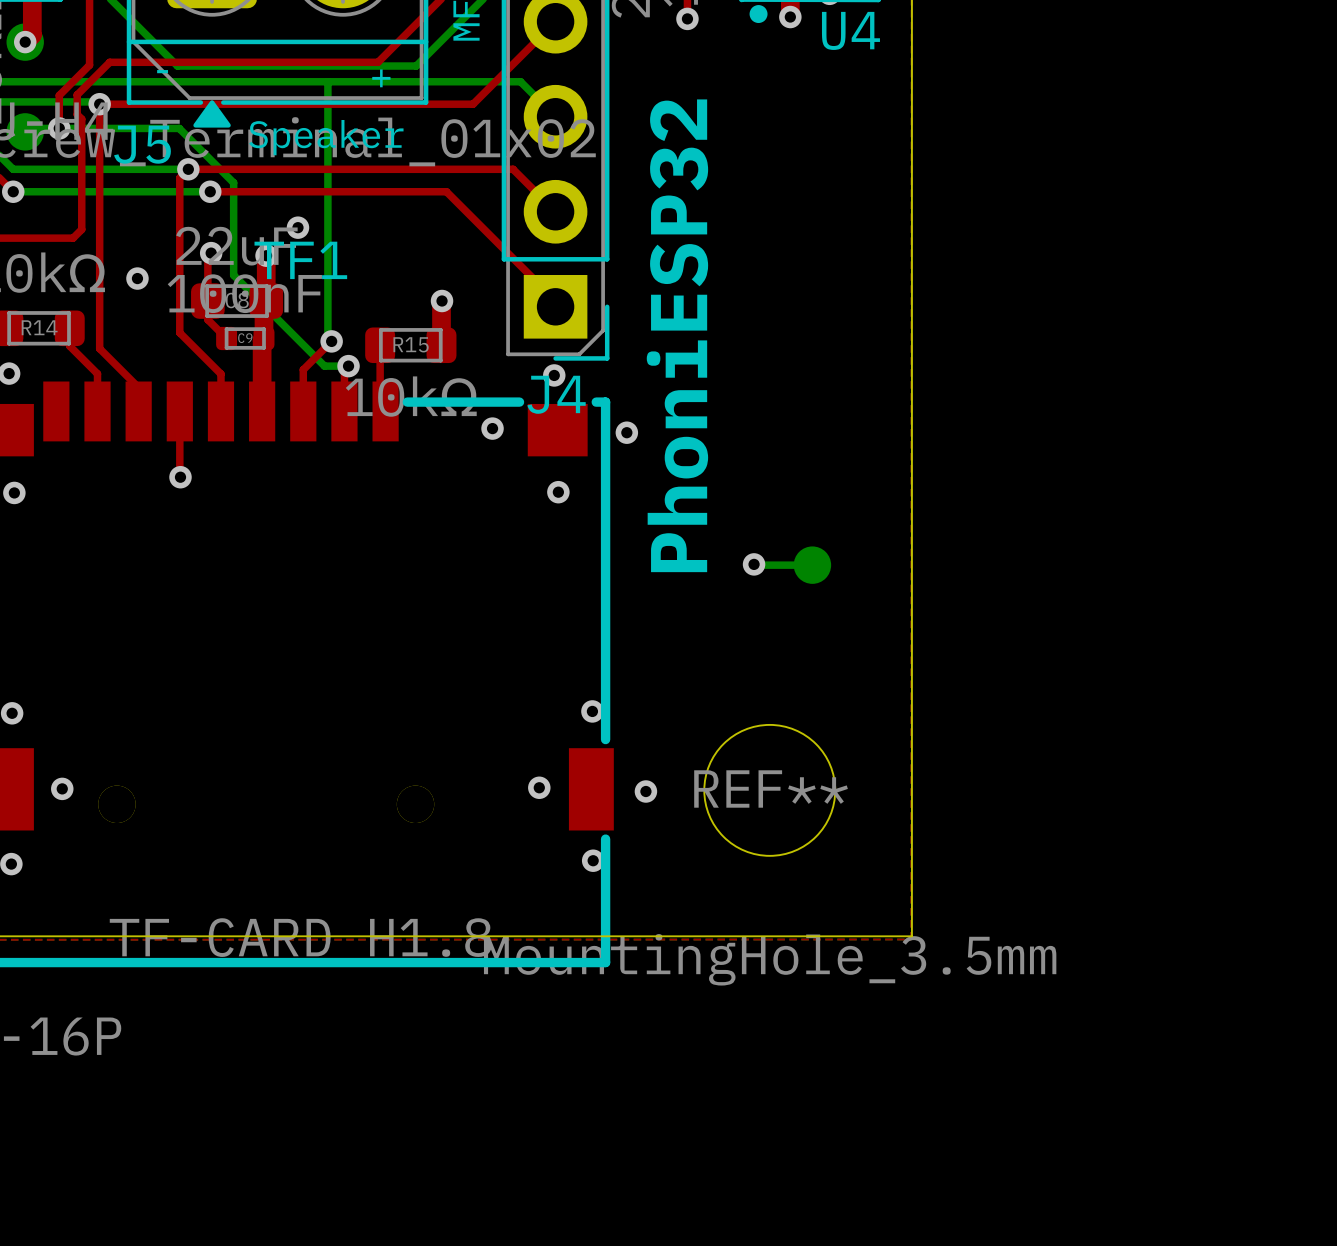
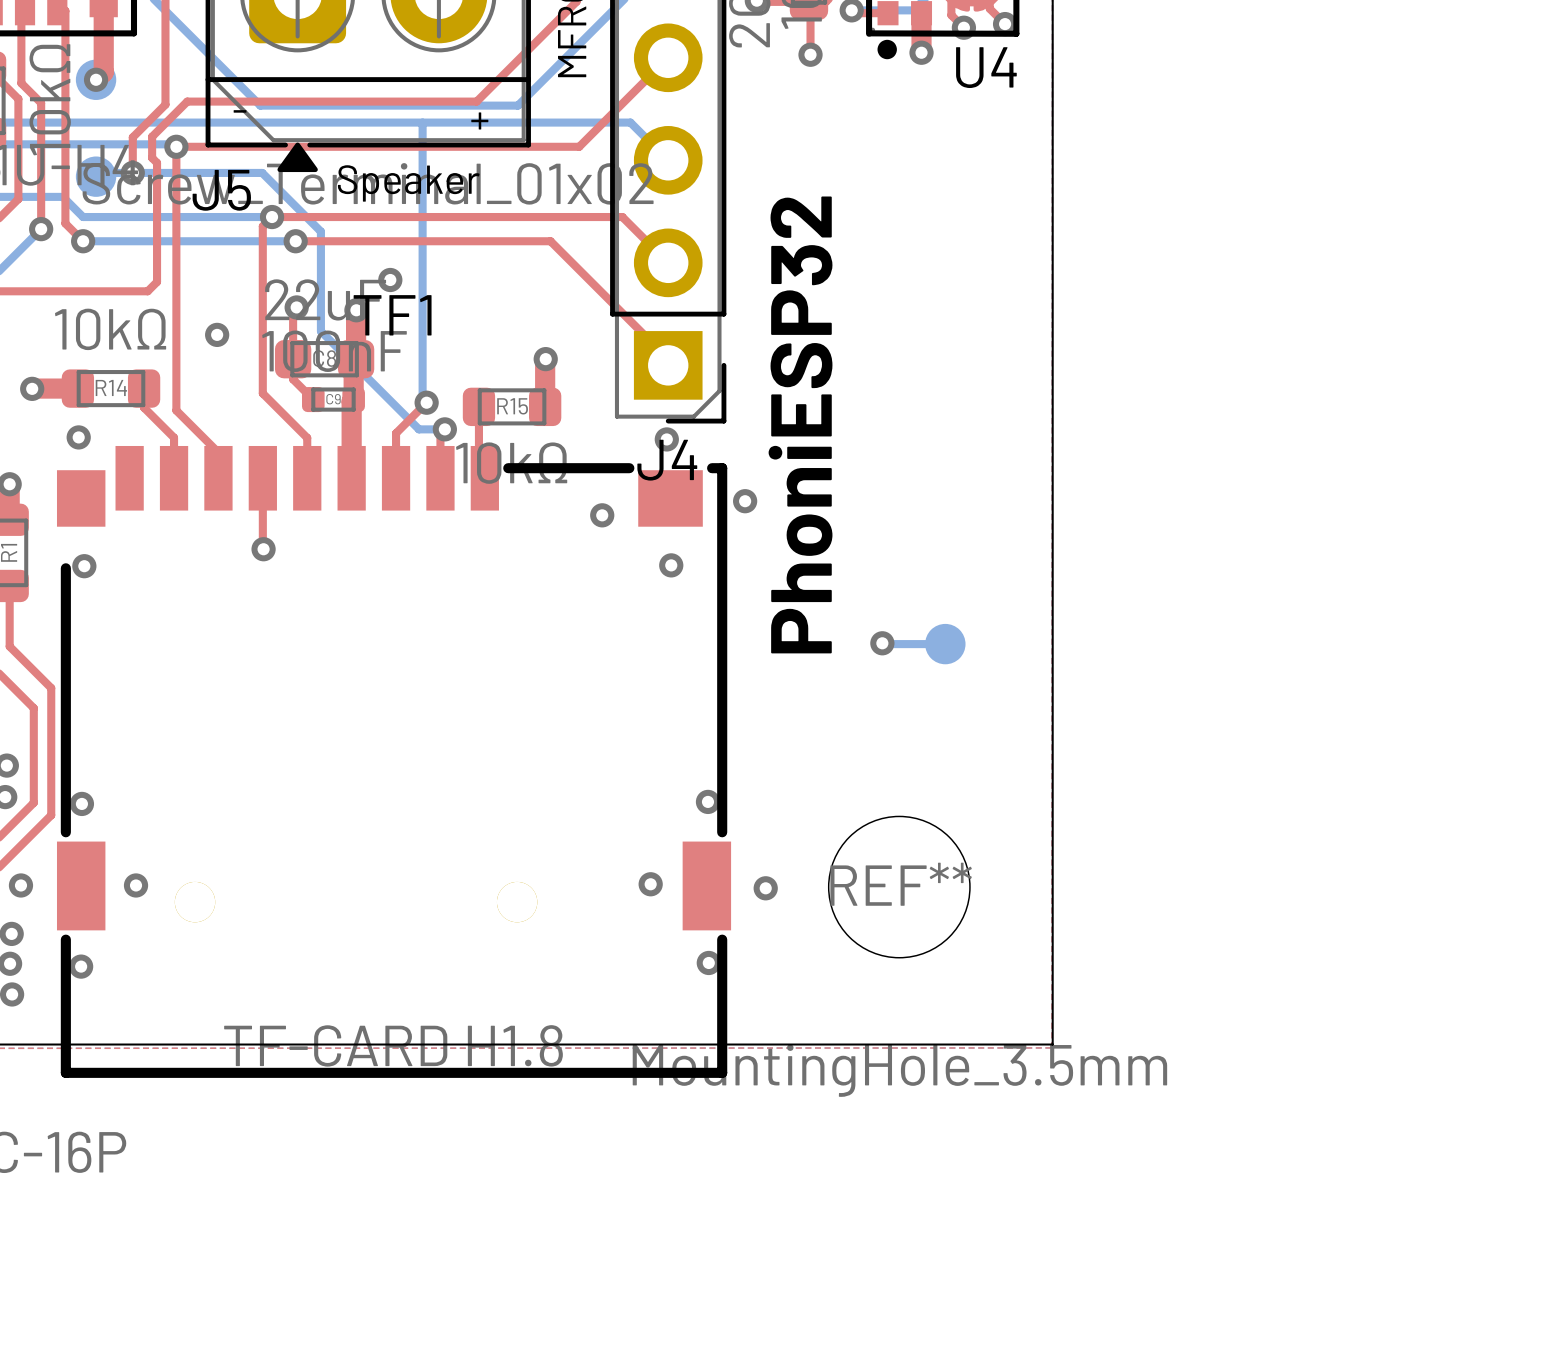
via position: (492, 428) -> (602, 515)

